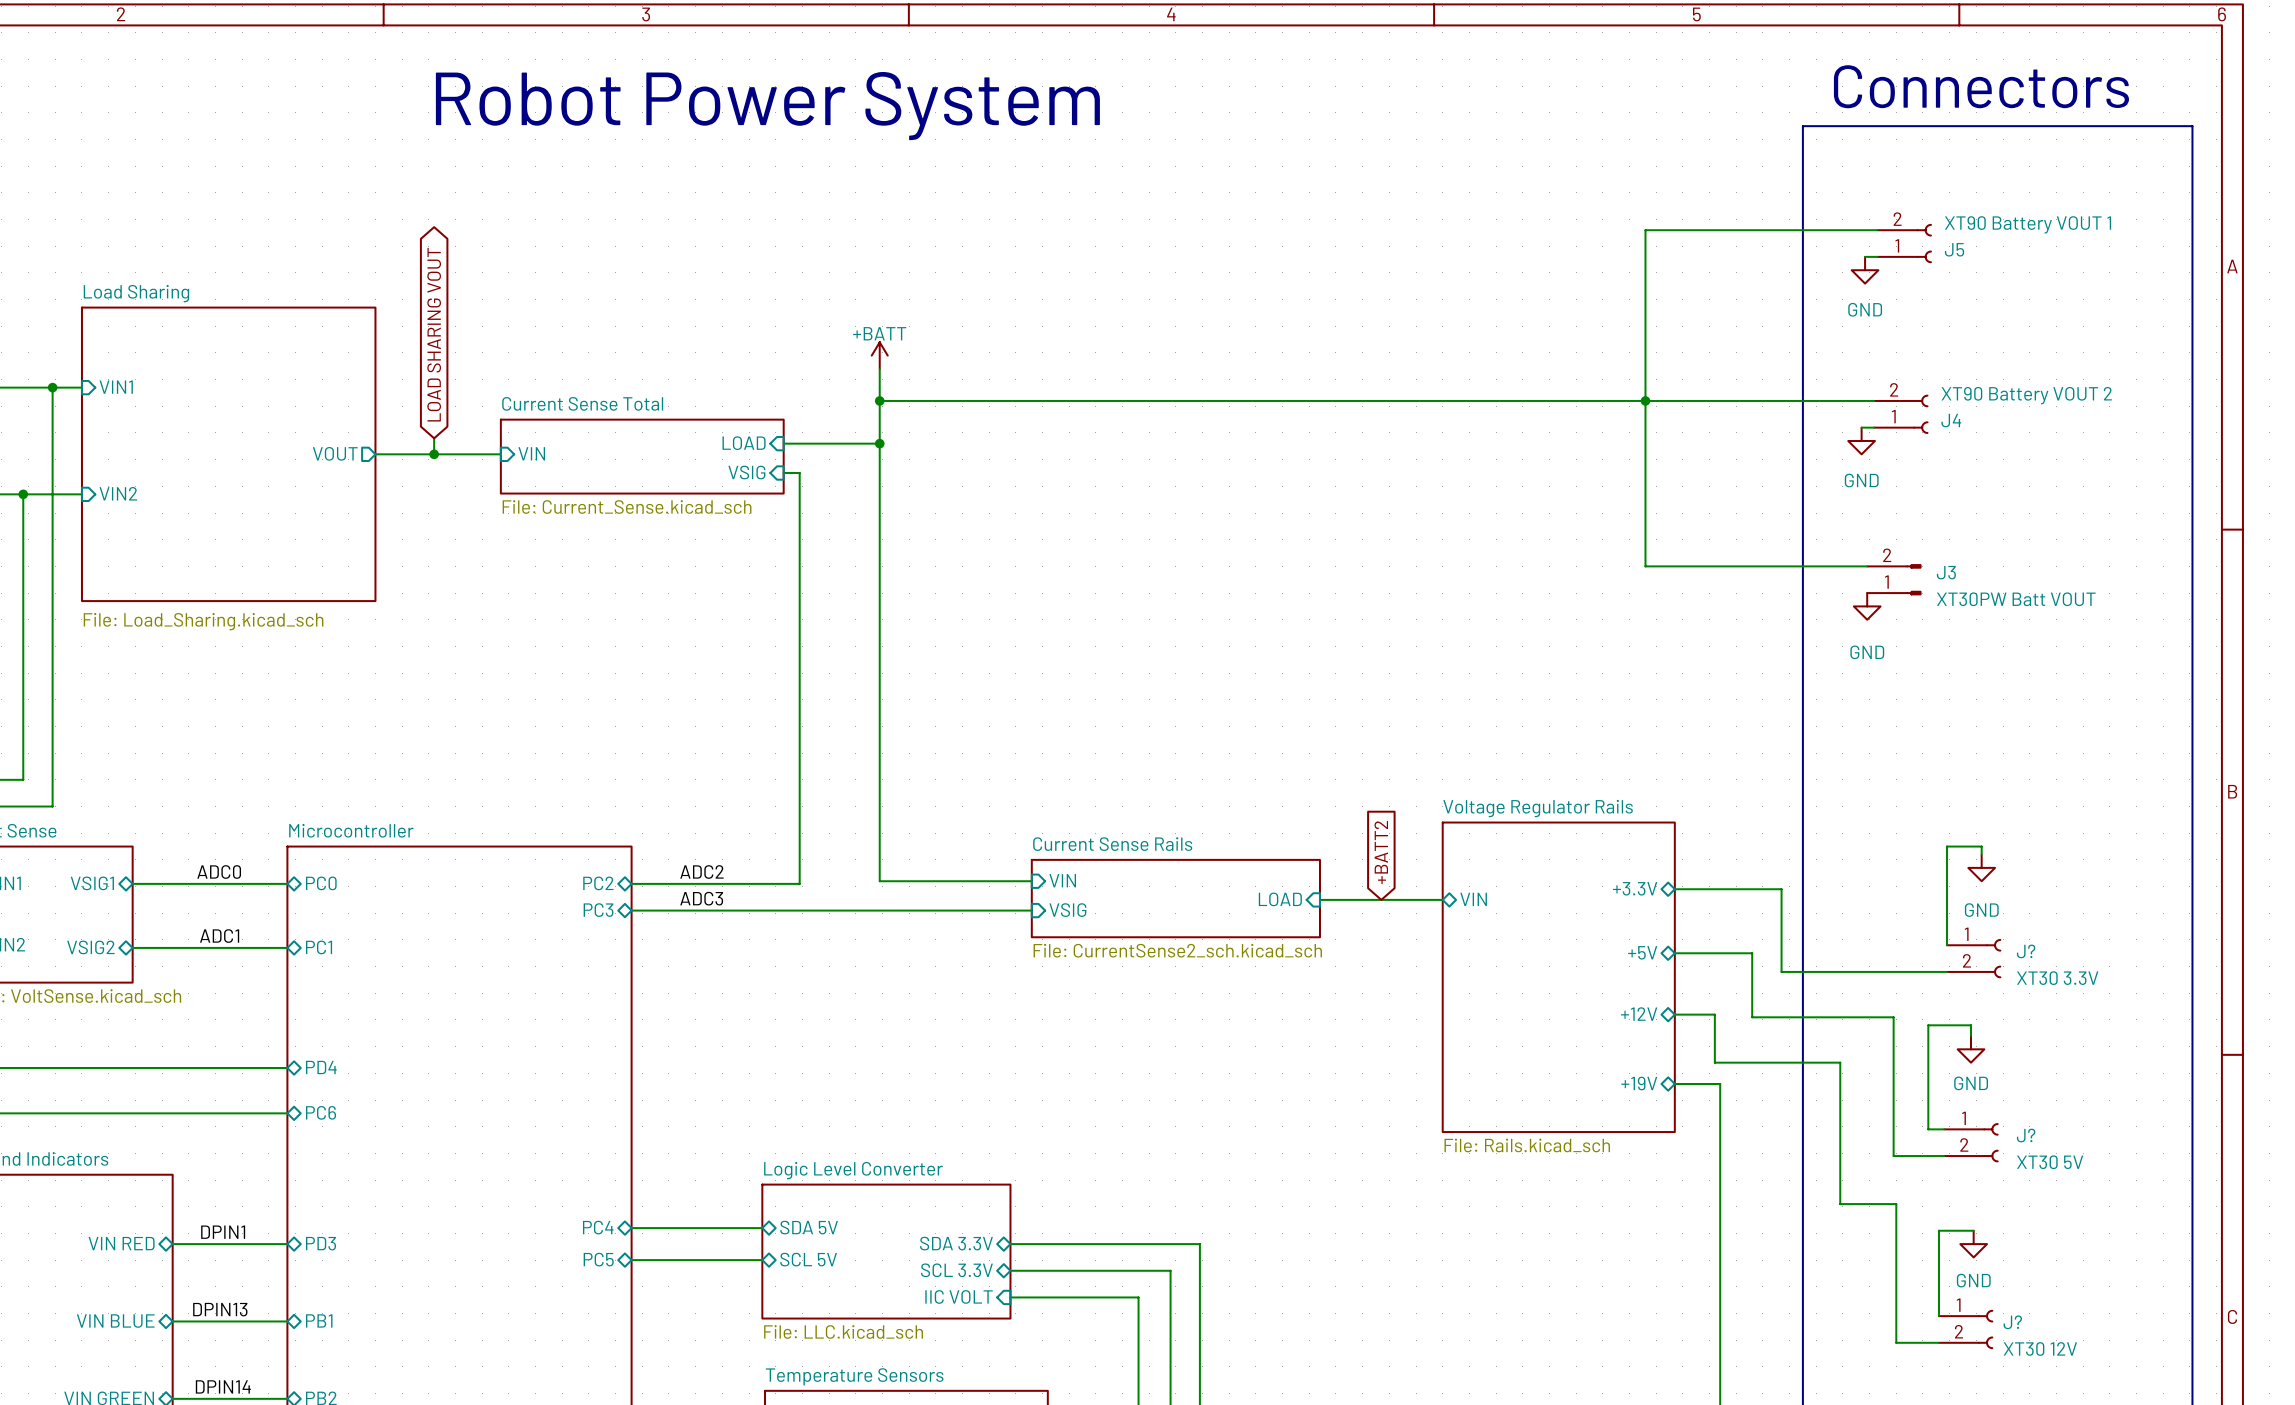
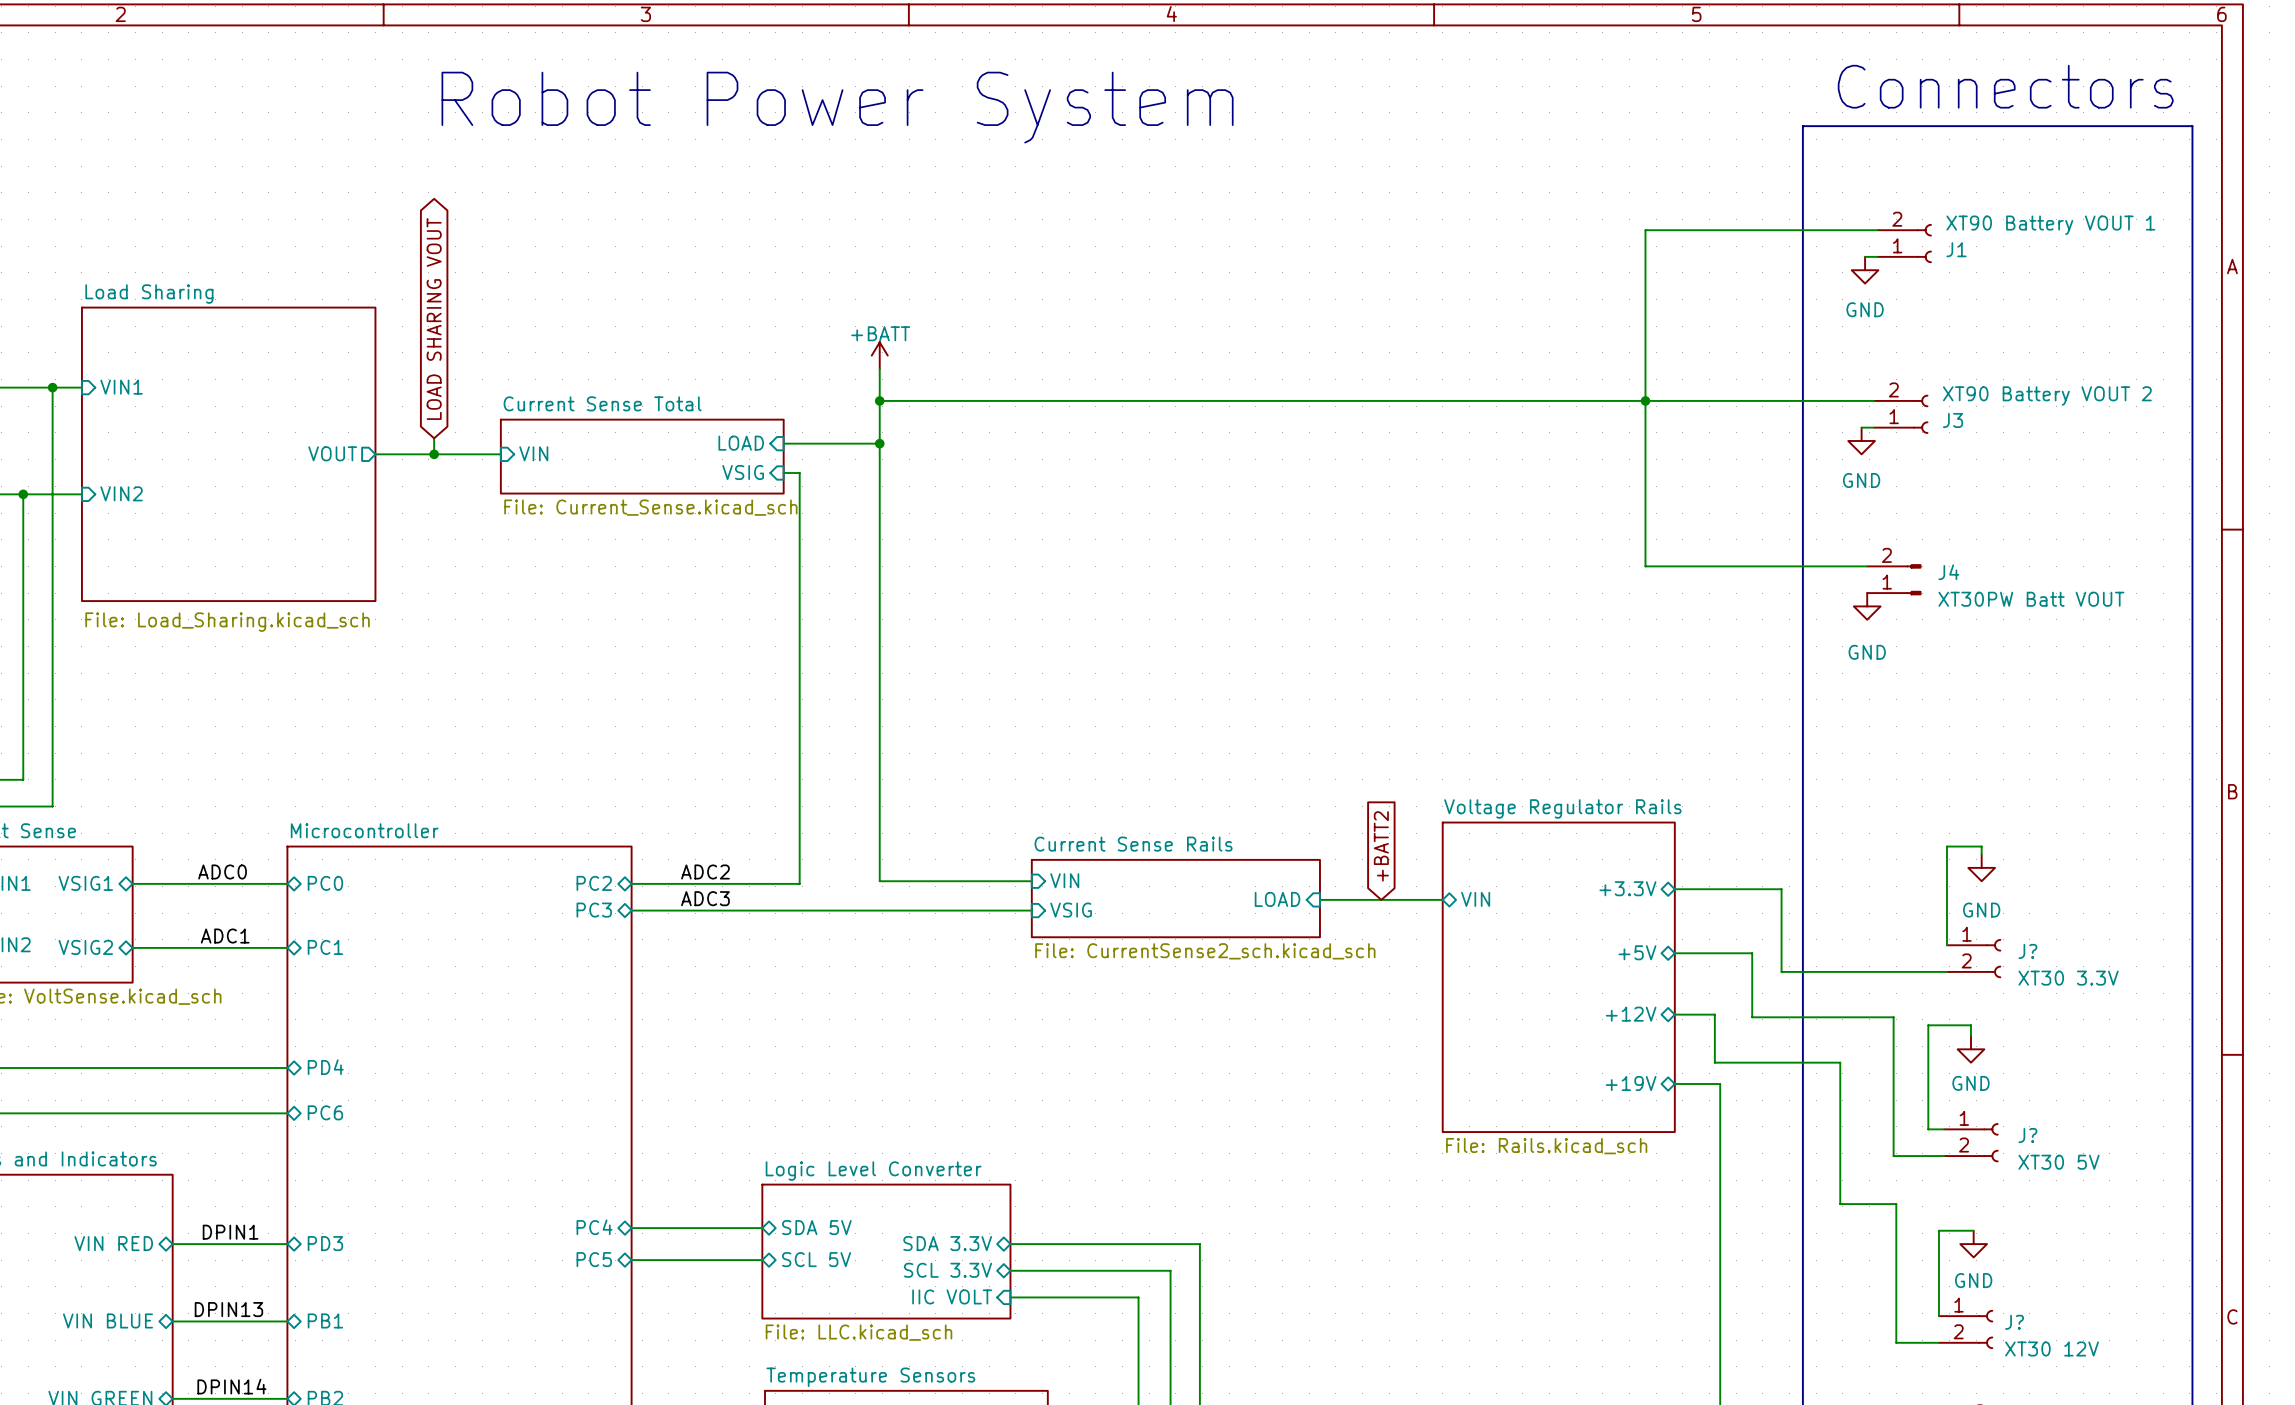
J5 name: J5 (1954, 249) -> J1 (1956, 249)
J4 name: J4 (1951, 420) -> J3 (1953, 420)
J3 name: J3 (1946, 572) -> J4 (1948, 572)

